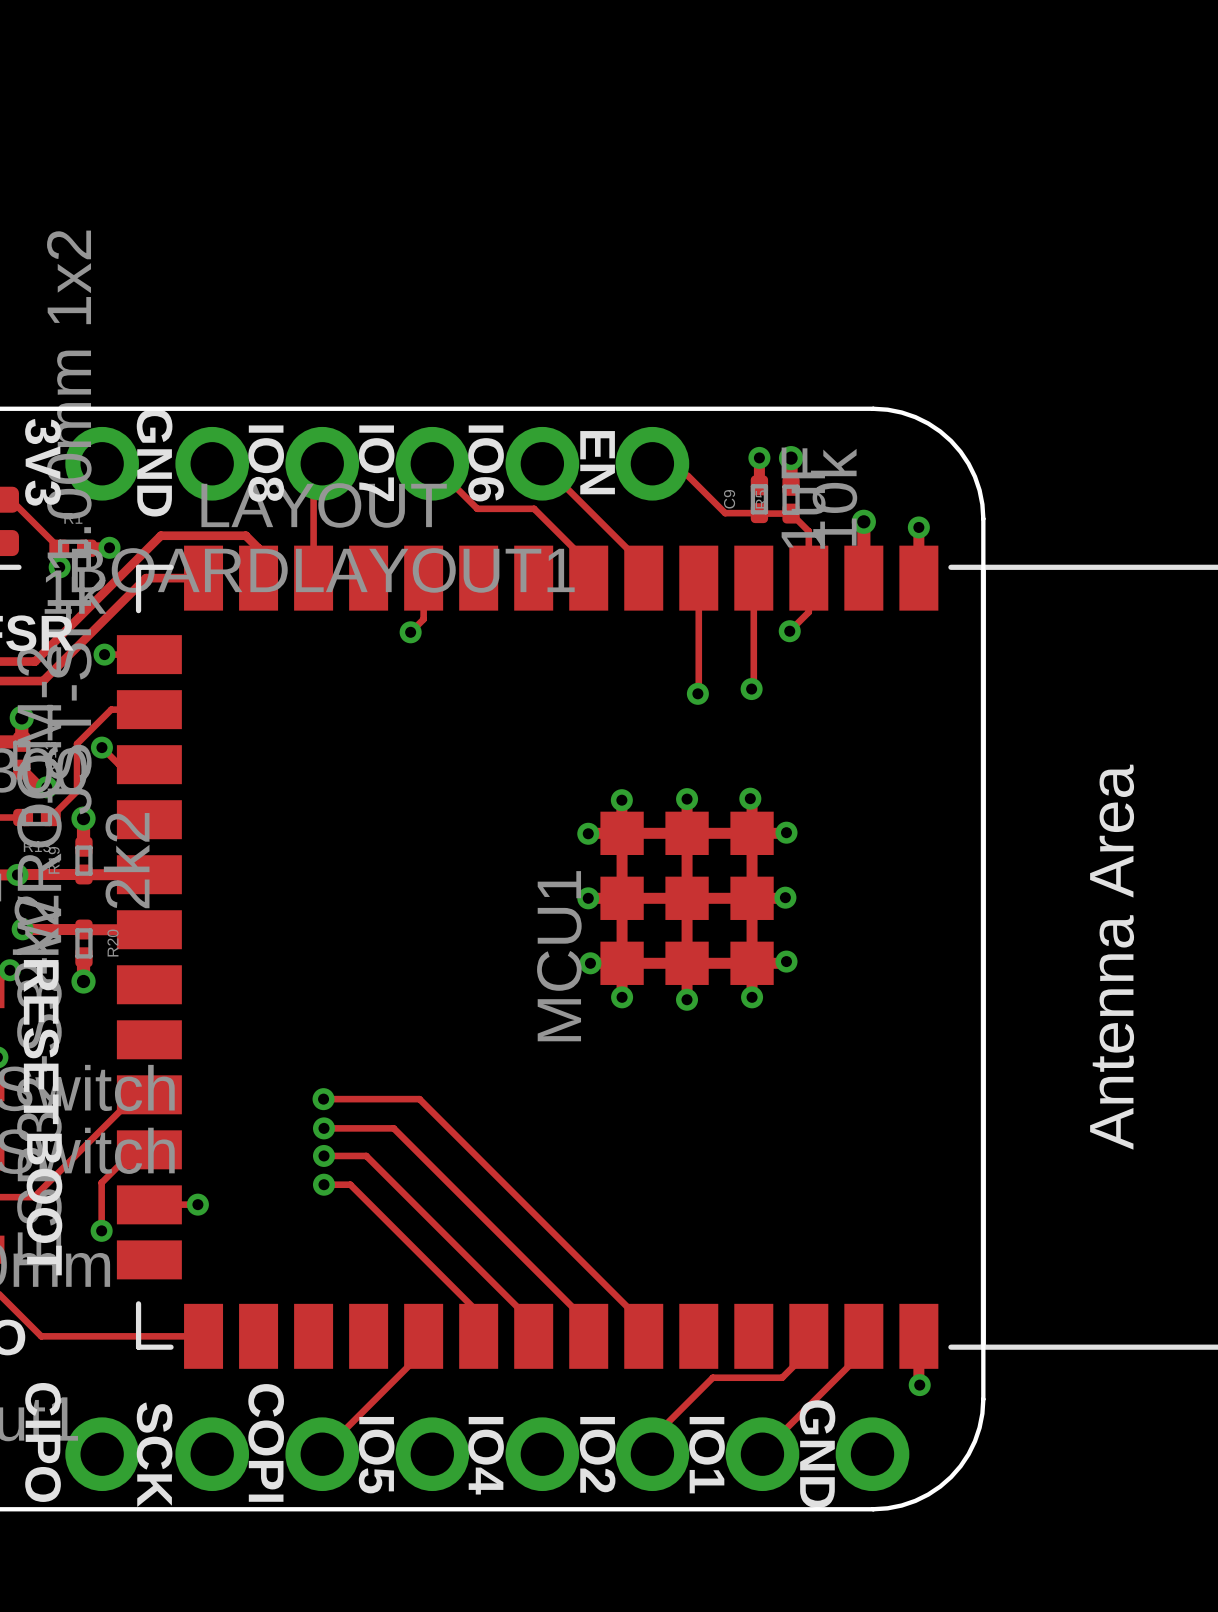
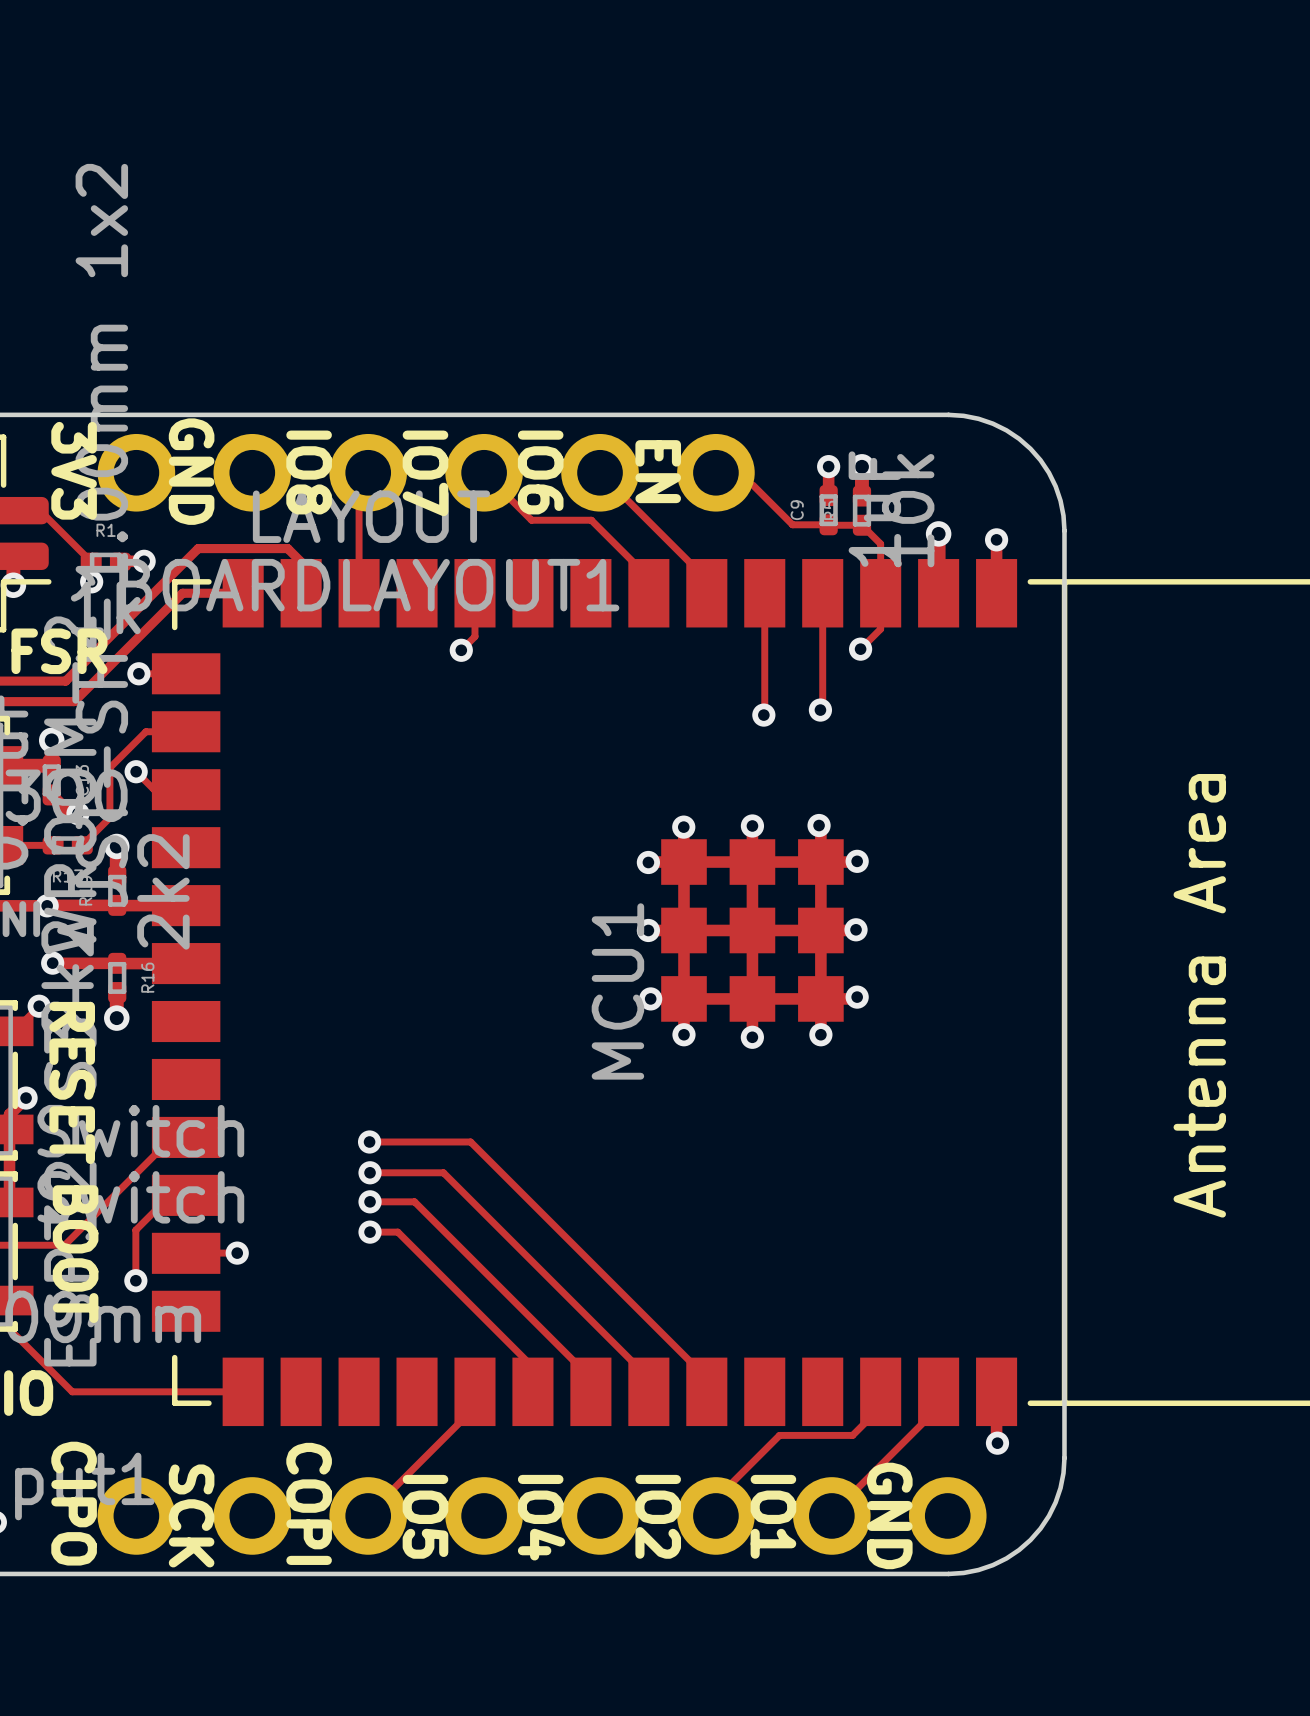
R20 name: R20 (113, 943) -> R16 (147, 977)

